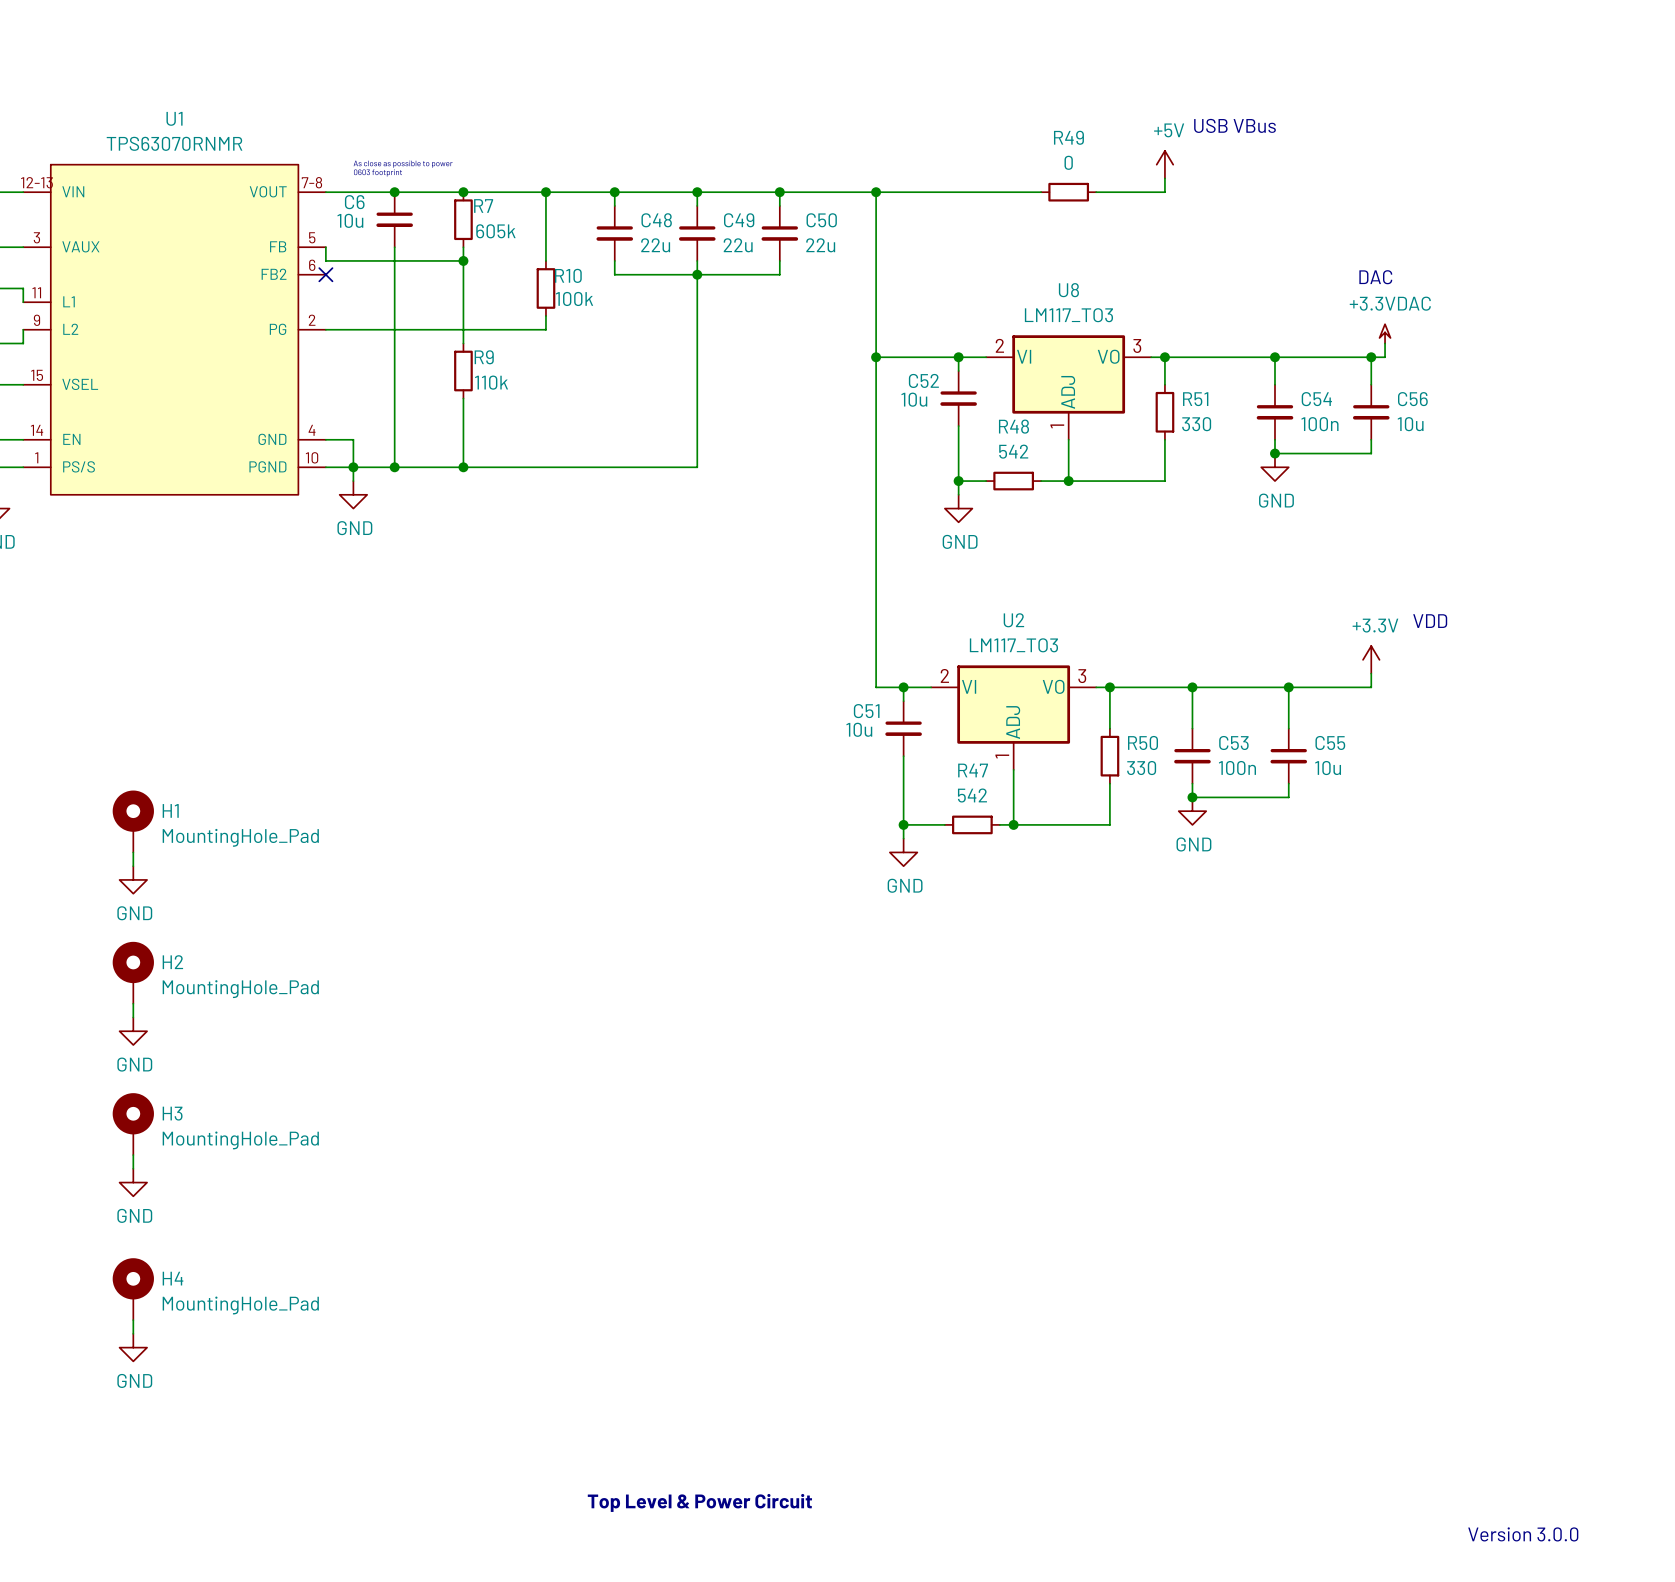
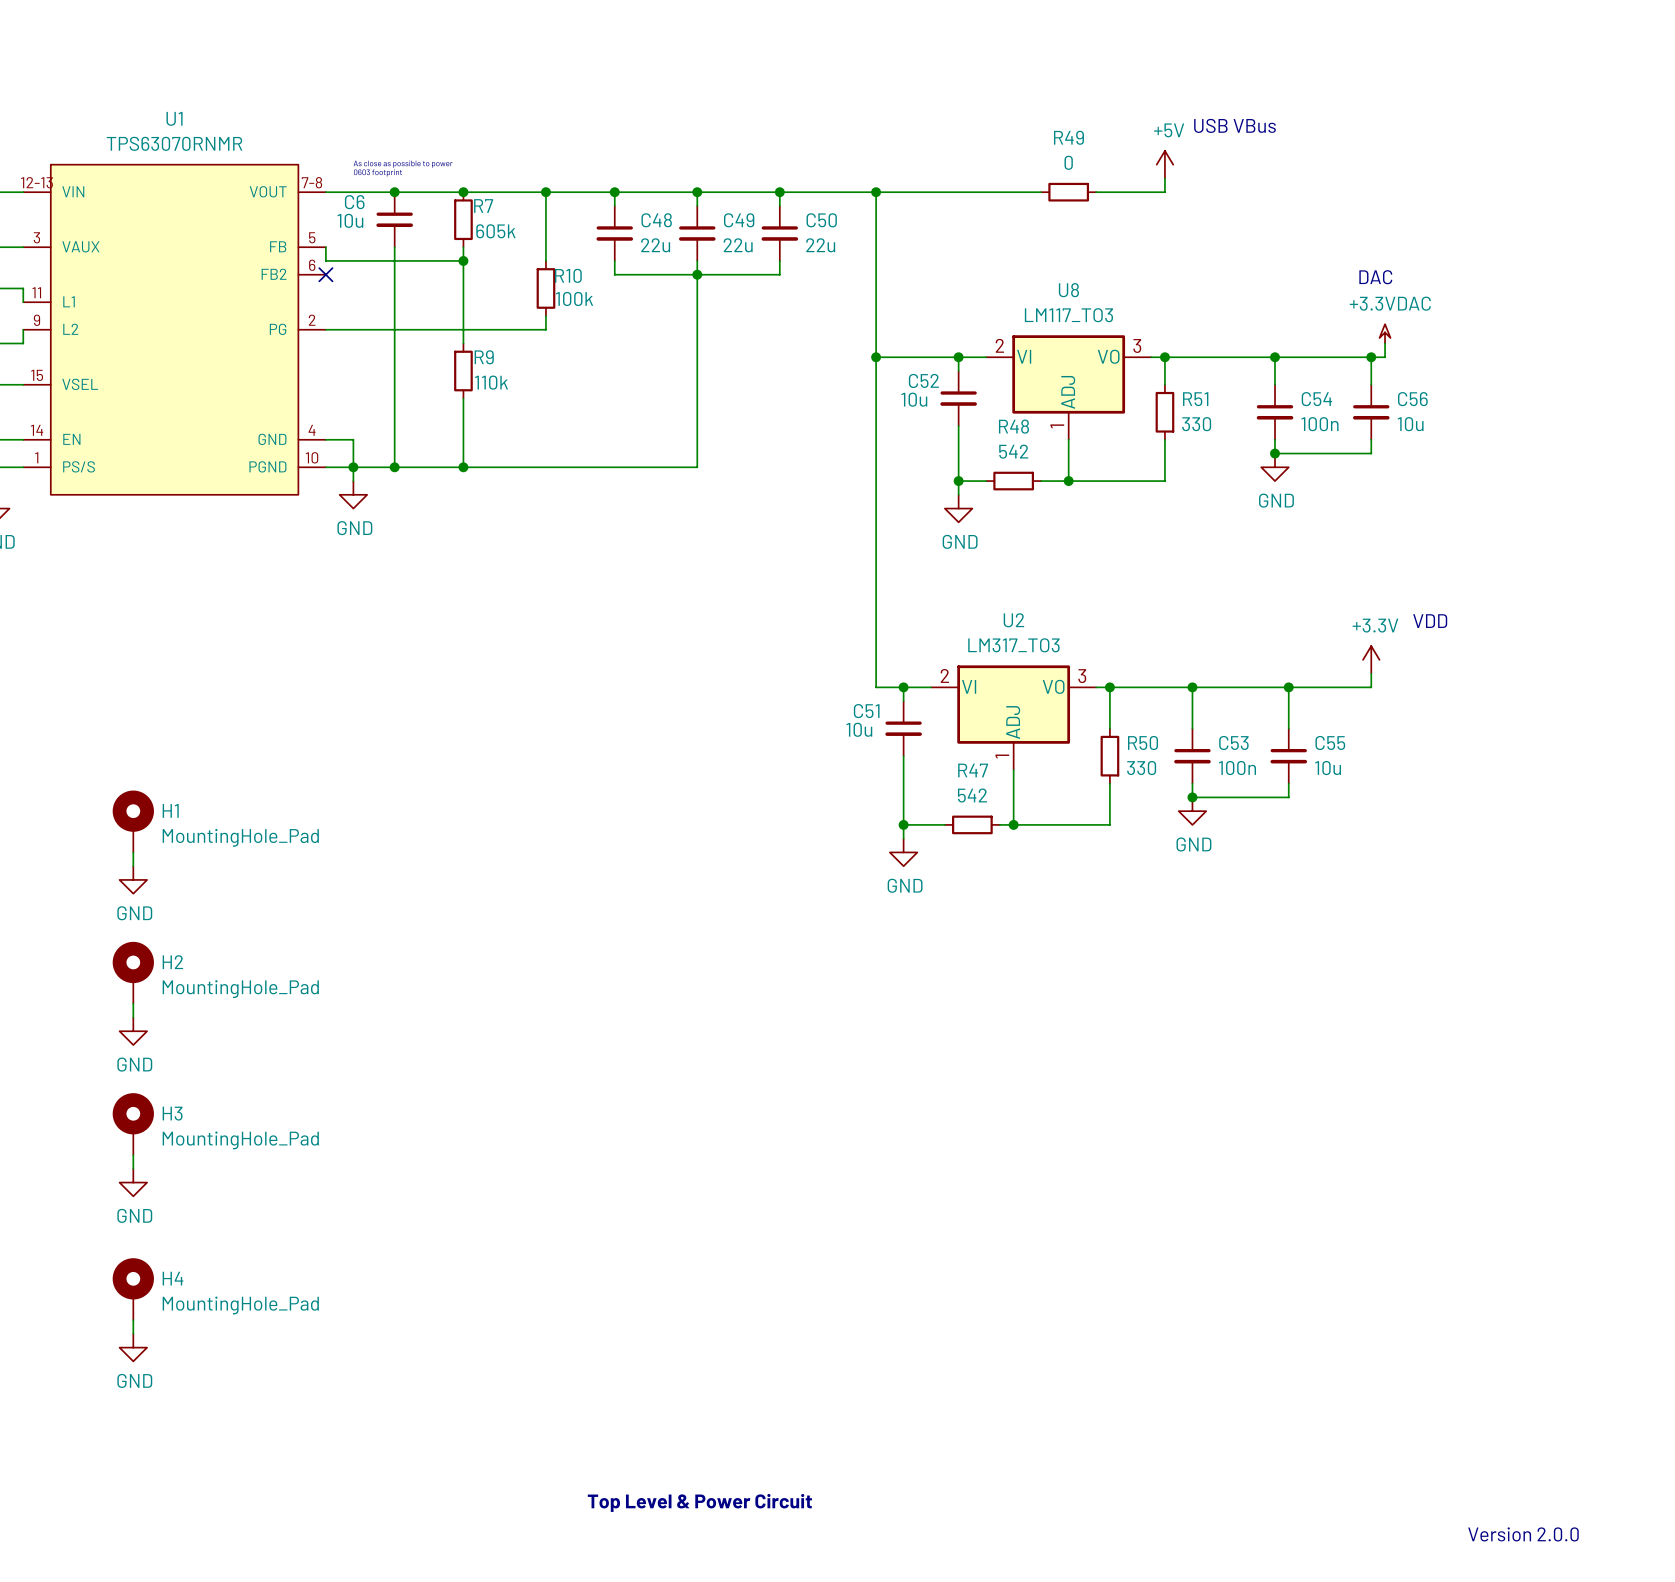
U2 value: LM117_TO3 (1013, 645) -> LM317_TO3 (1013, 645)
text: Version 3.0.0 (1523, 1534) -> Version 2.0.0 (1523, 1534)

